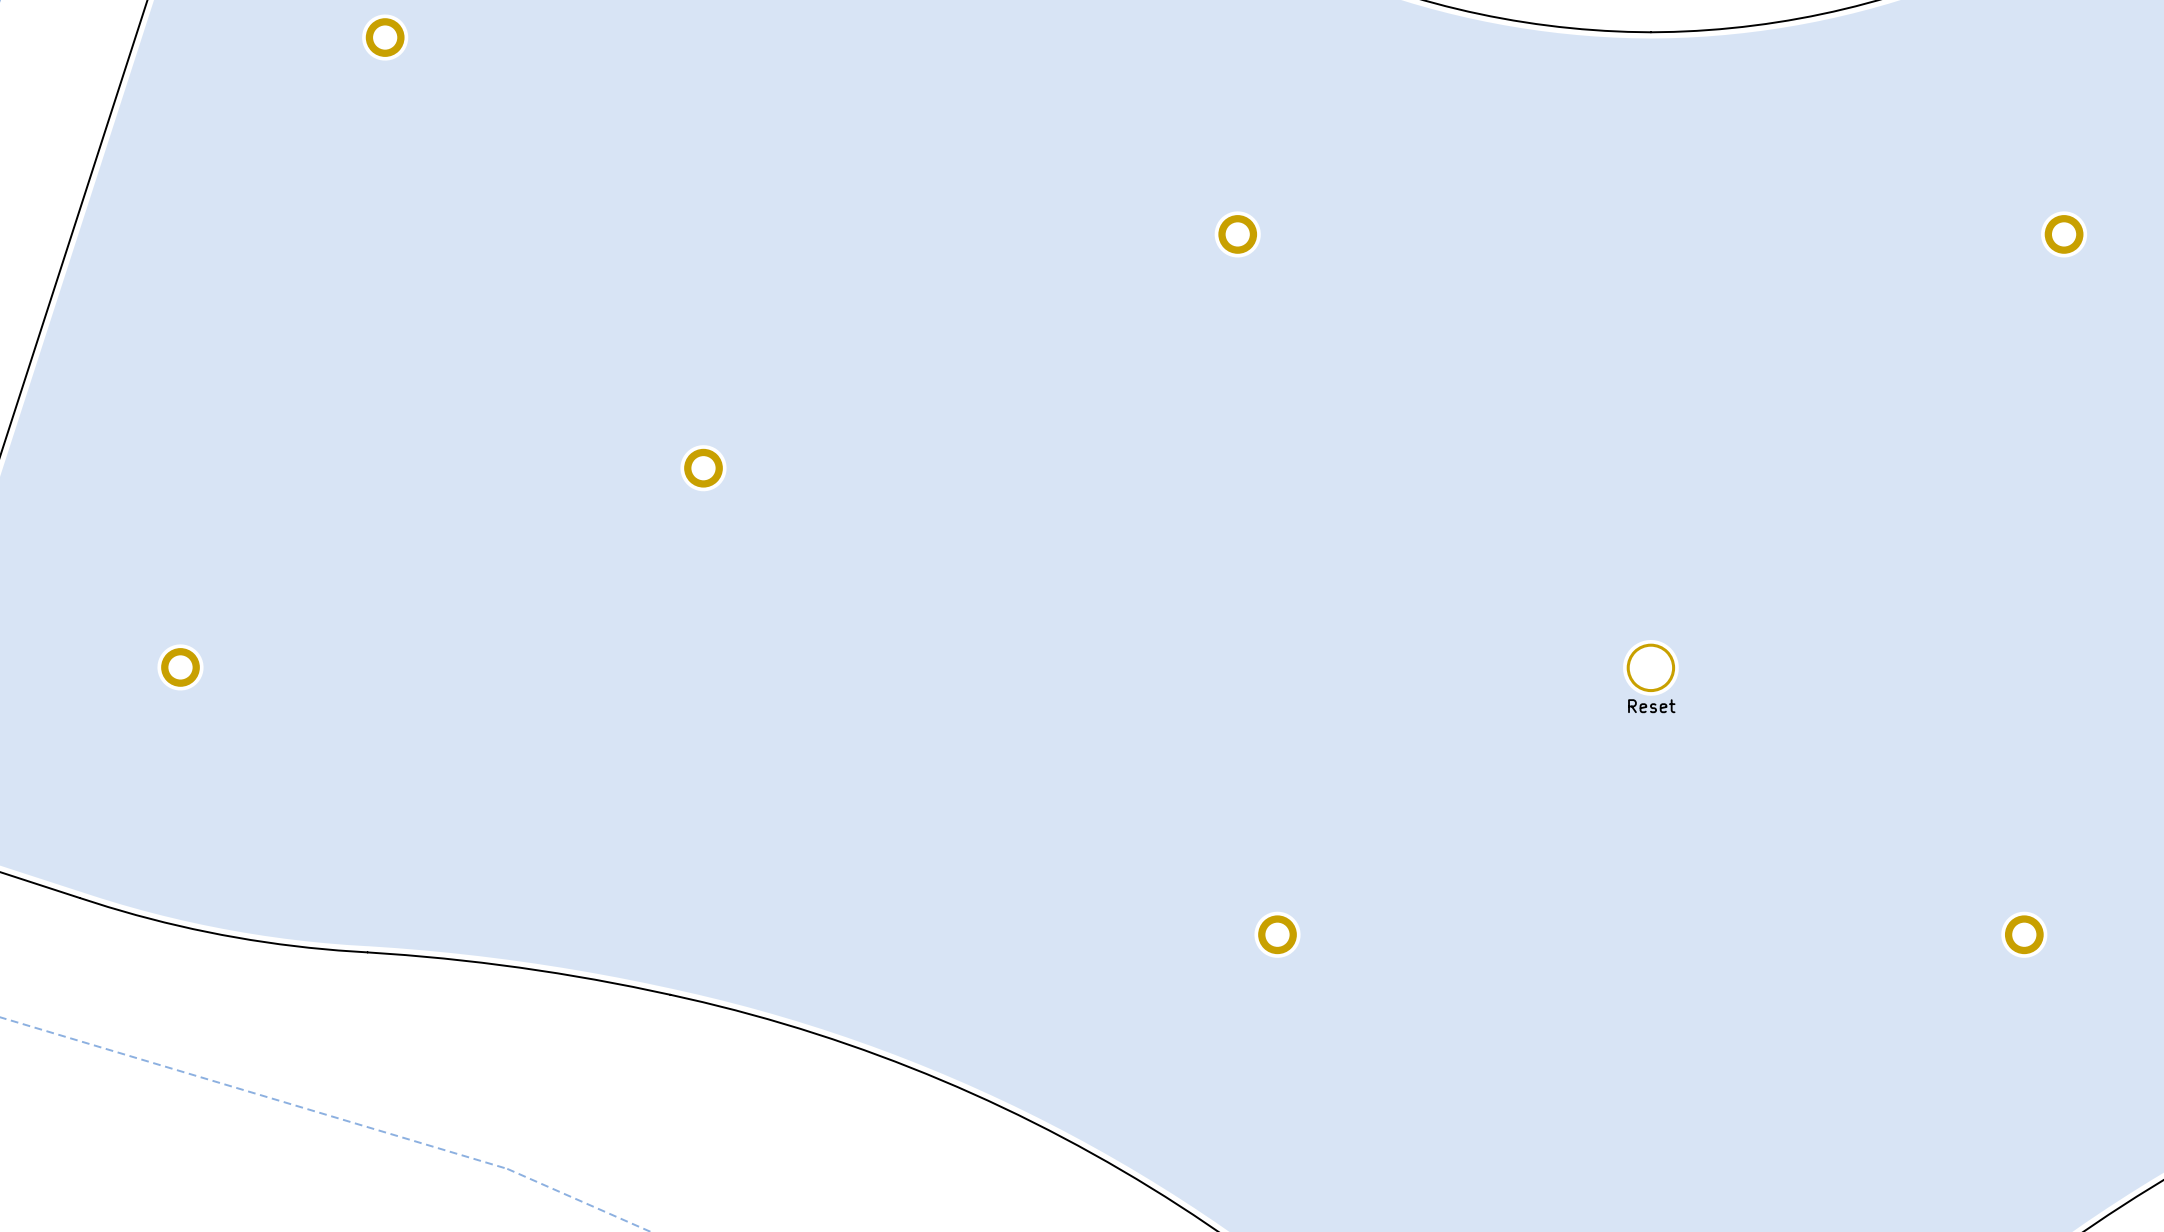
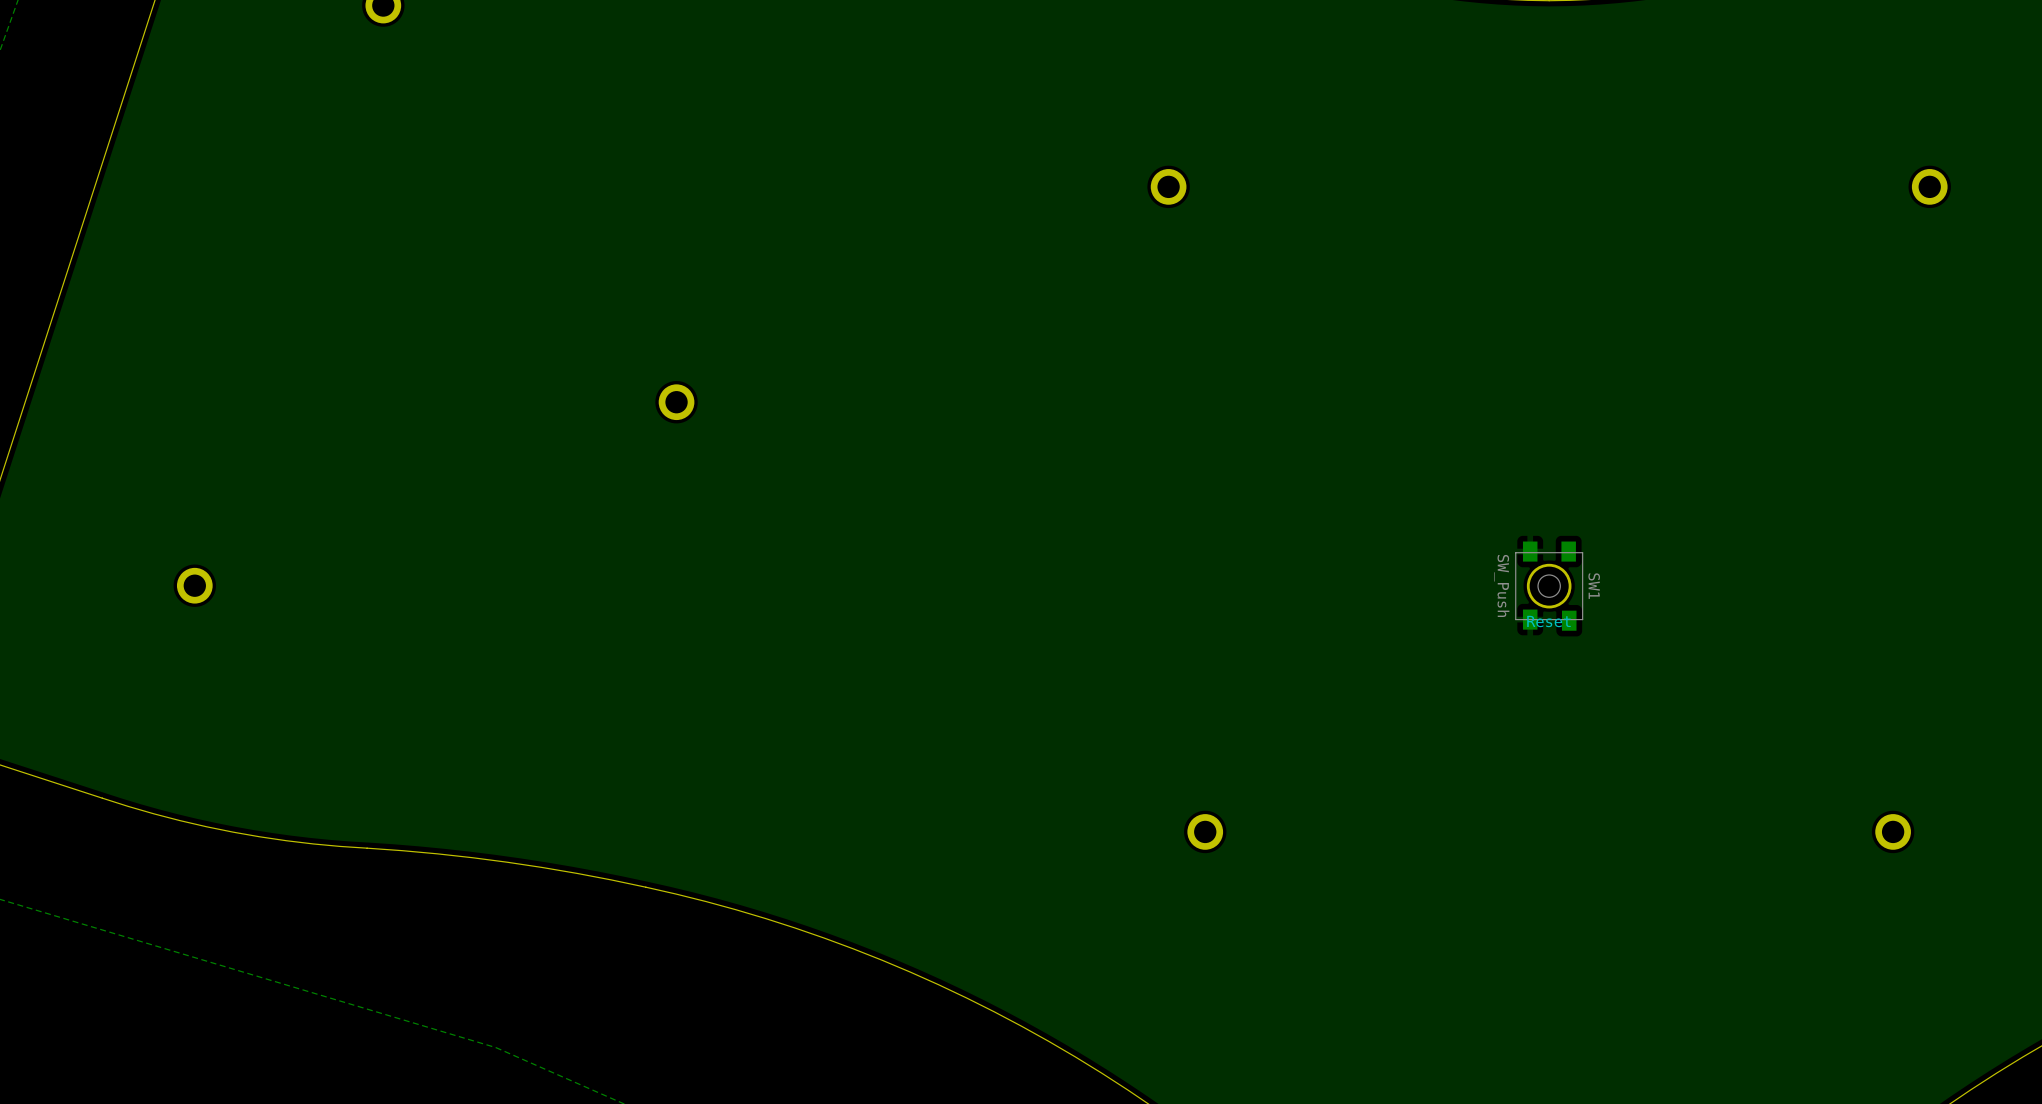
SW1: none -> SW_Push (1549, 586)

